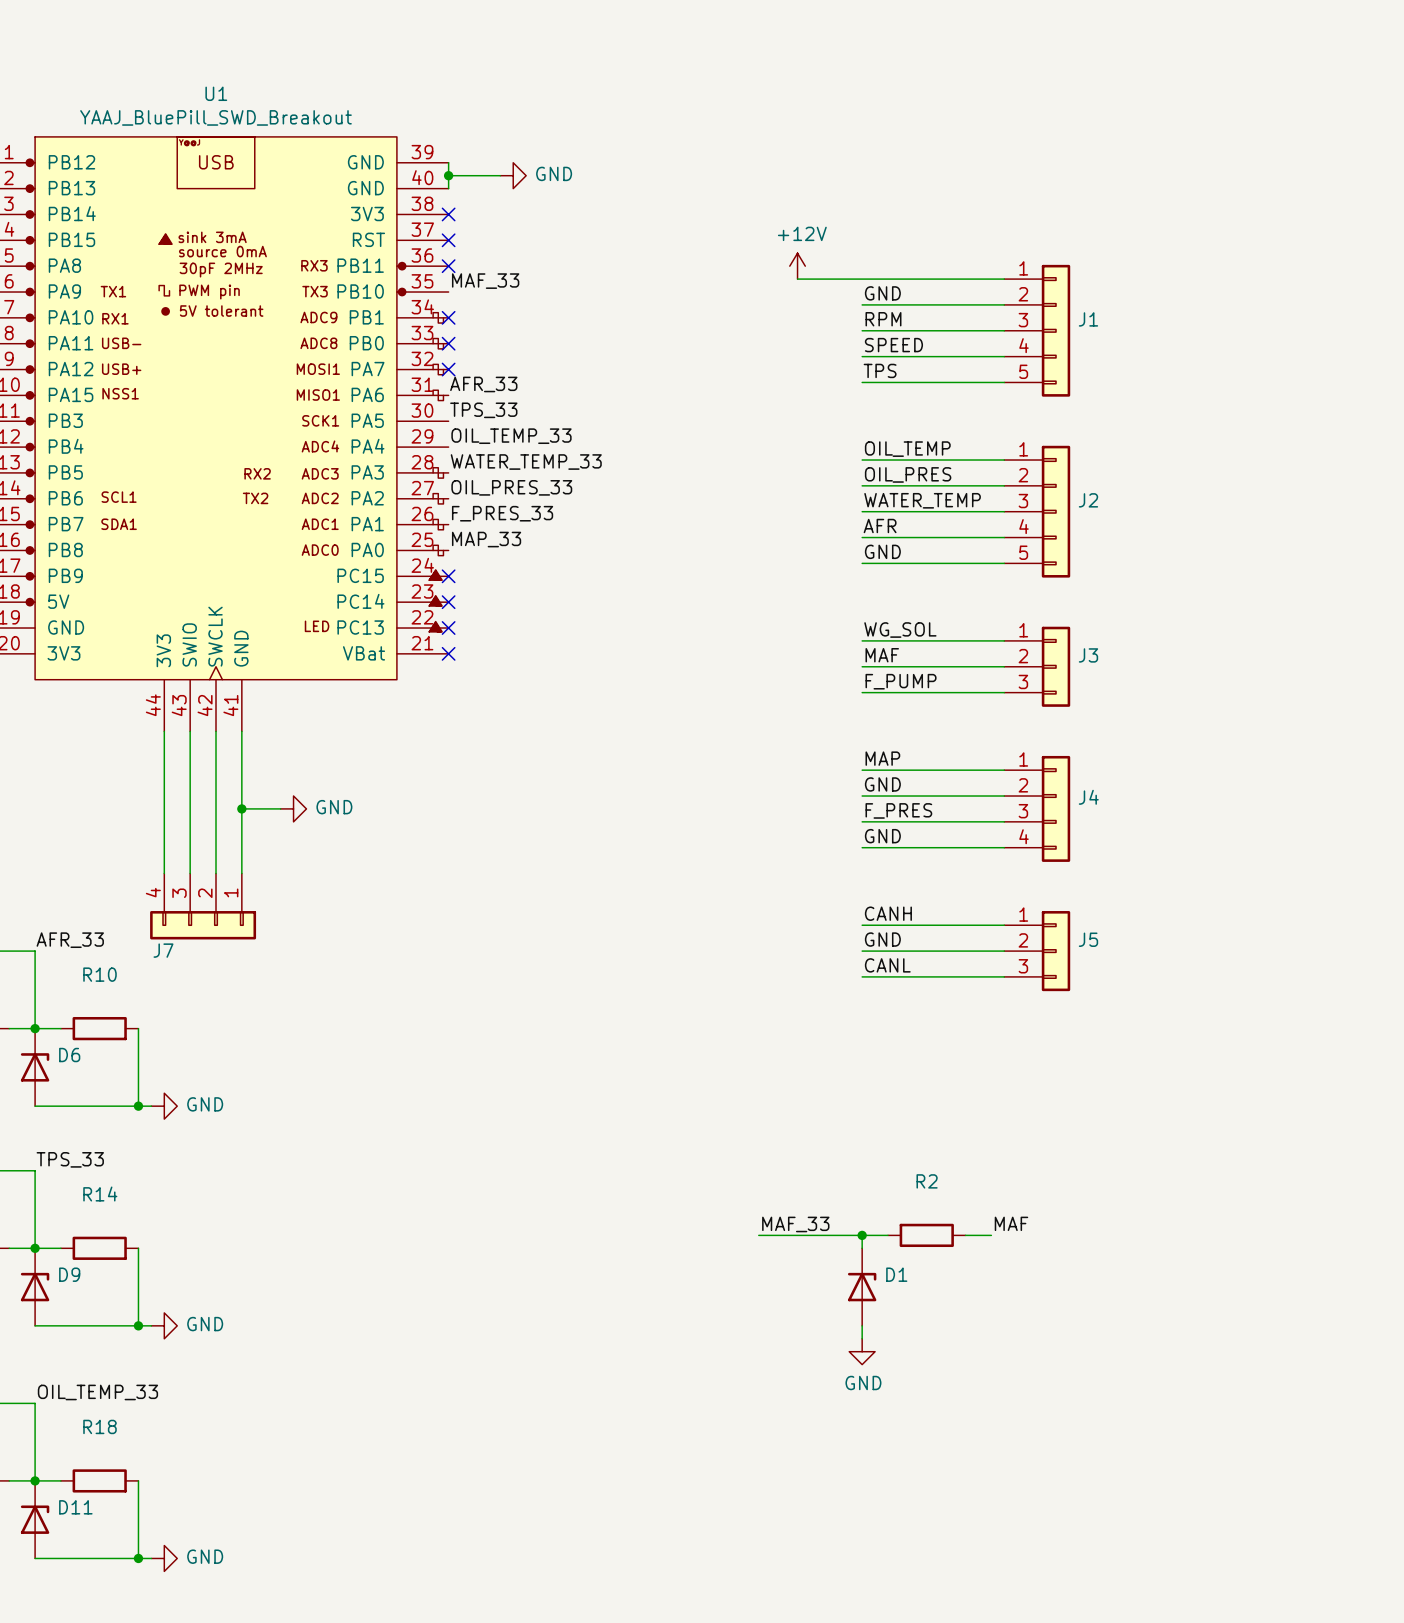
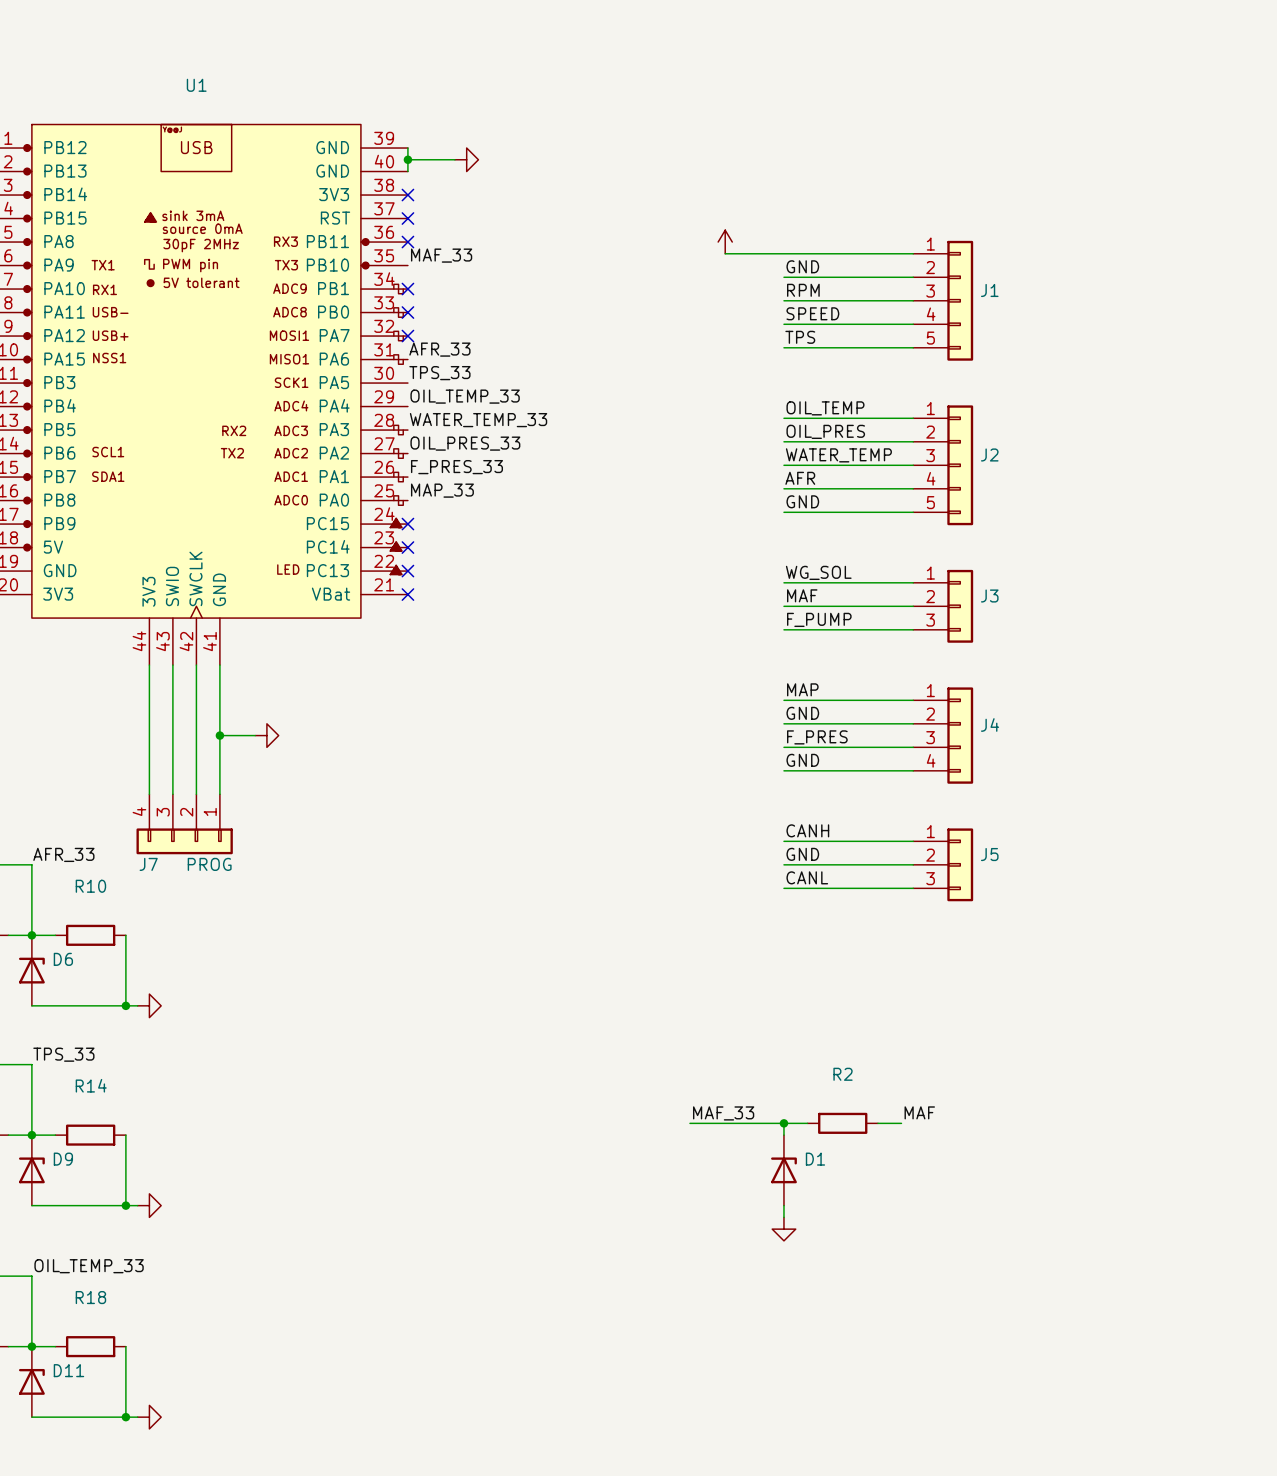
U1 value: YAAJ_BluePill_SWD_Breakout (216, 117) -> none
power symbol text: GND (554, 173) -> none
power symbol text: +12V (802, 233) -> none
power symbol text: GND (334, 807) -> none
J7 value: none -> PROG (209, 864)
power symbol text: GND (205, 1104) -> none
power symbol text: GND (205, 1324) -> none
power symbol text: GND (863, 1383) -> none
power symbol text: GND (205, 1556) -> none

